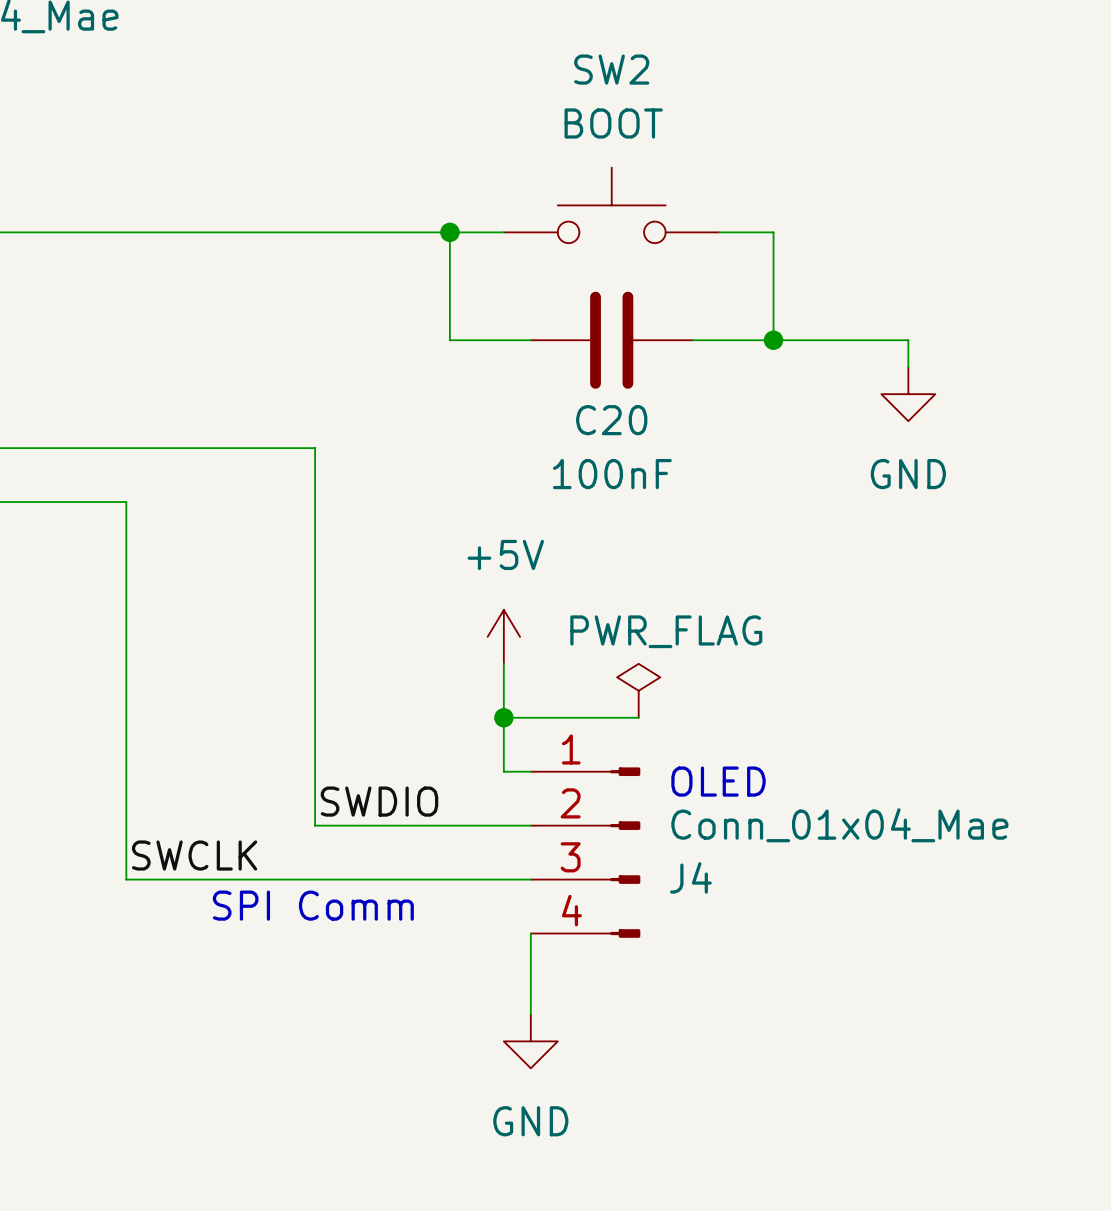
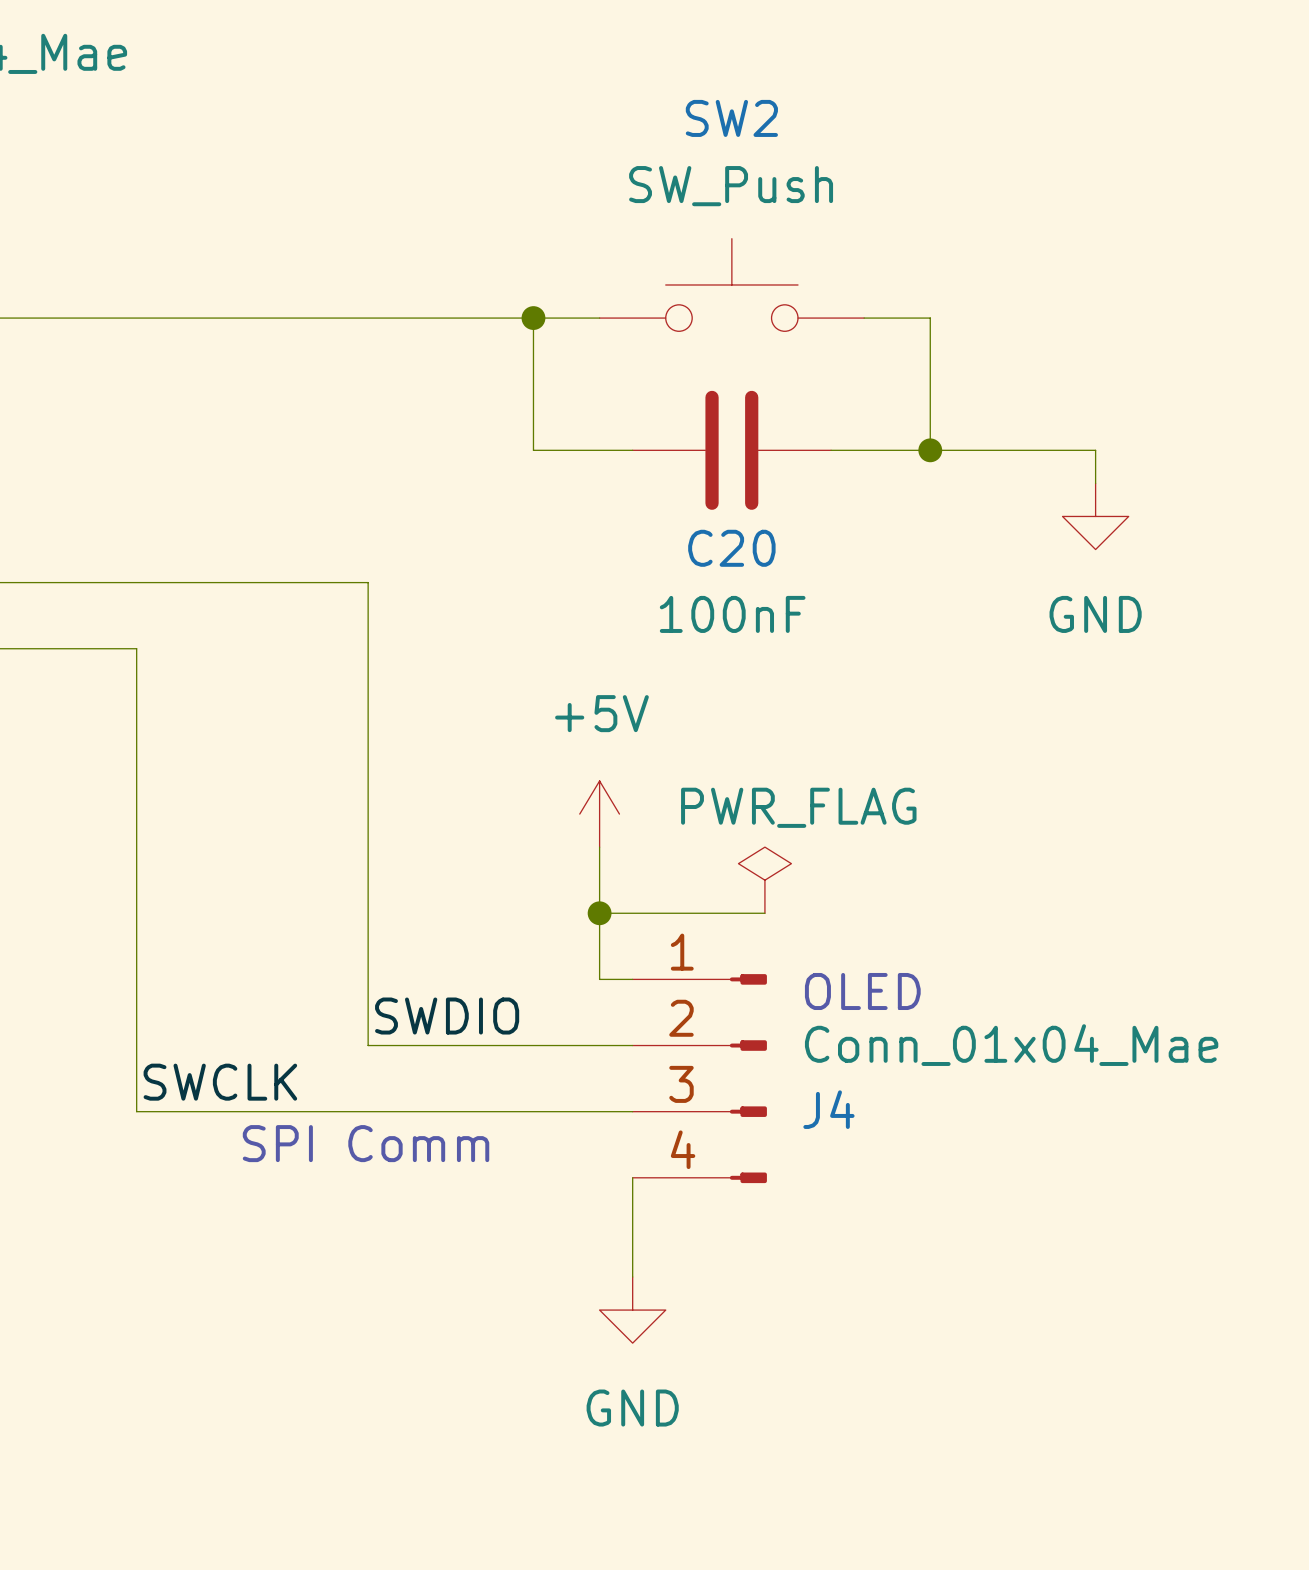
SW2 value: BOOT (613, 123) -> SW_Push (731, 186)

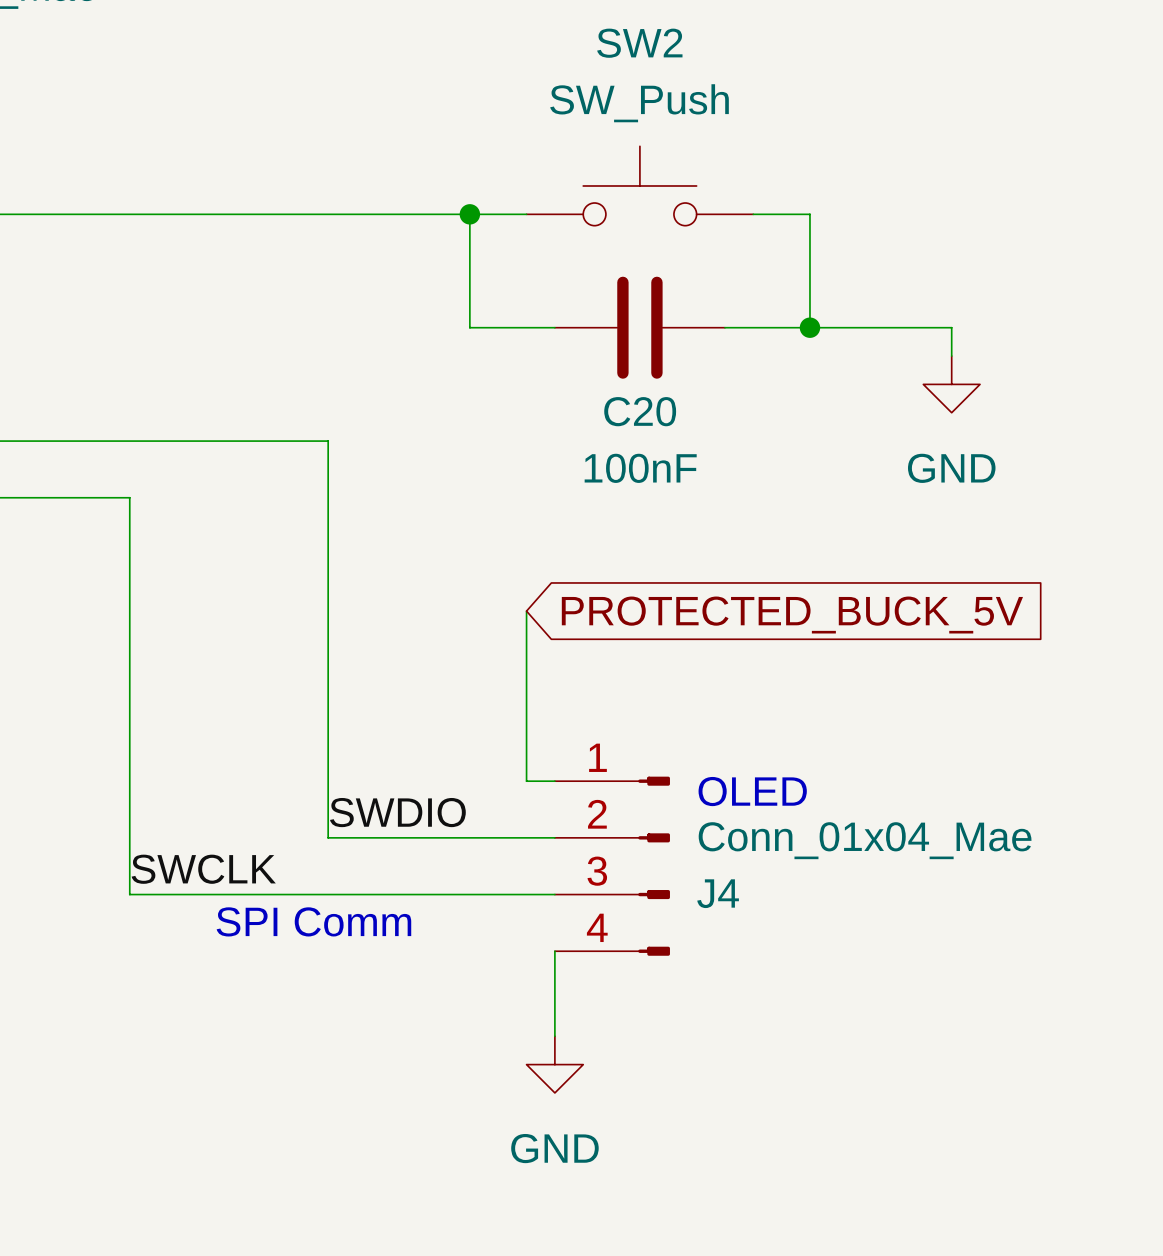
global label: none -> PROTECTED_BUCK_5V (792, 615)
power symbol: +5V (599, 814) -> none
power symbol: PWR_FLAG (764, 880) -> none
wire: (599, 913) (764, 913) -> none
junction: (599, 913) -> none

